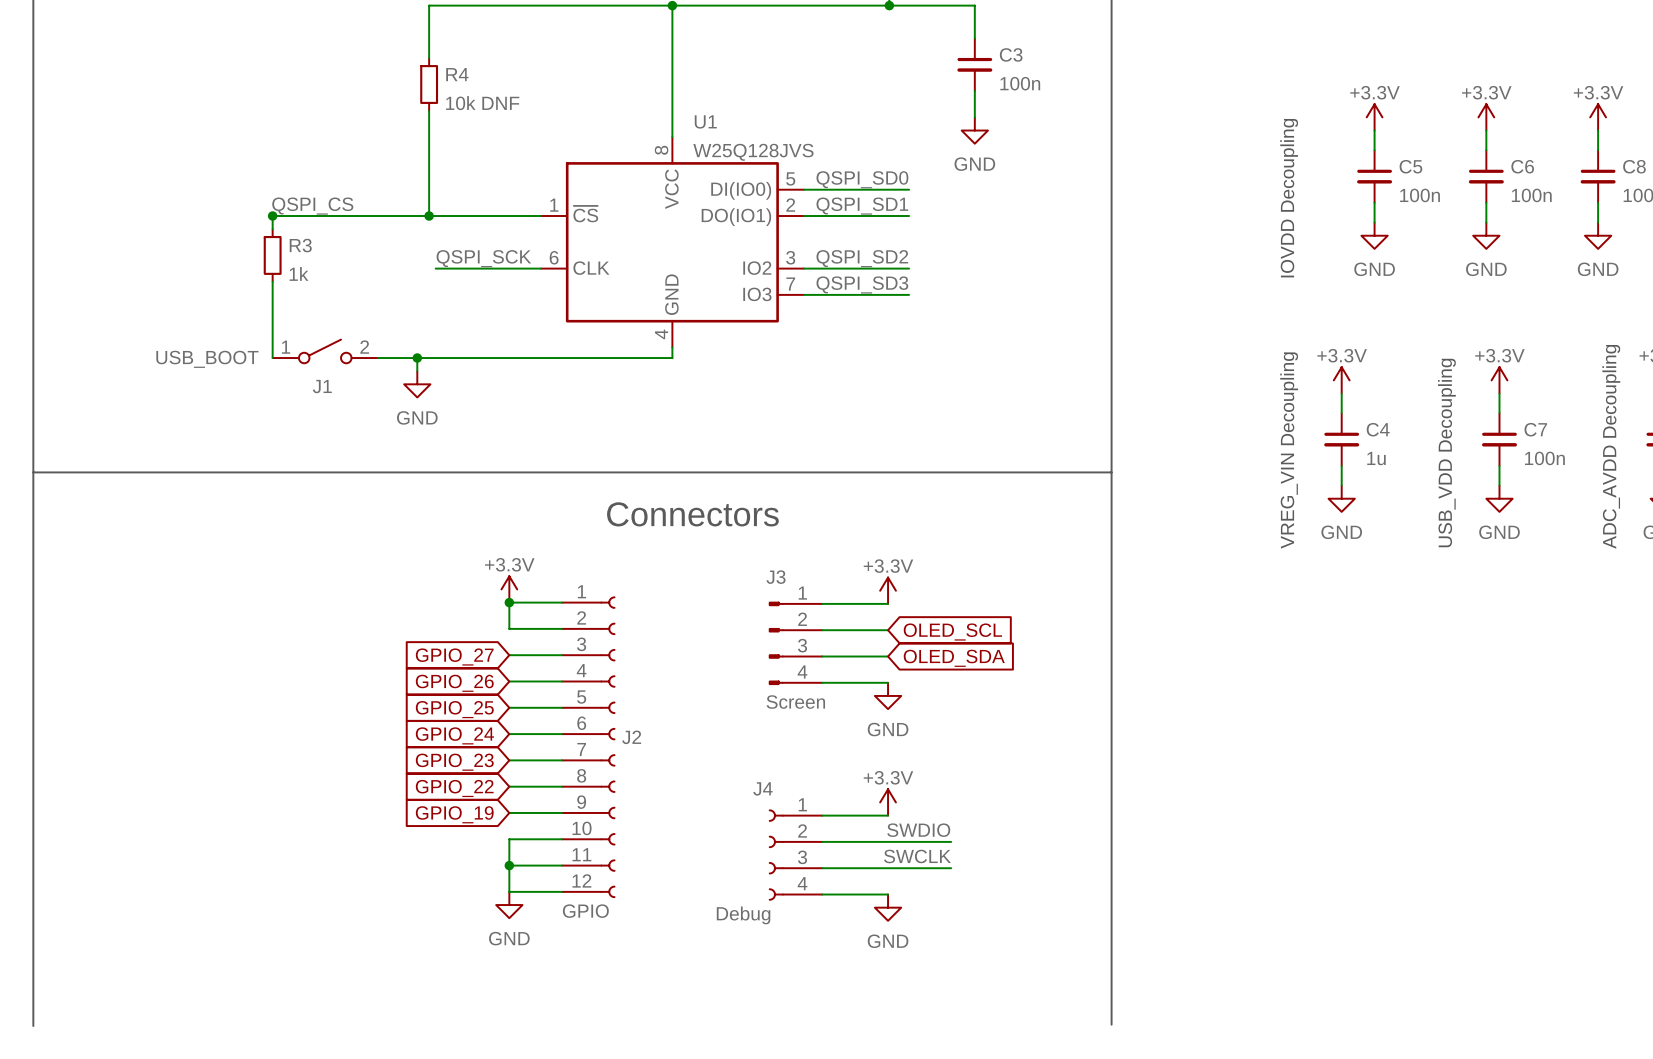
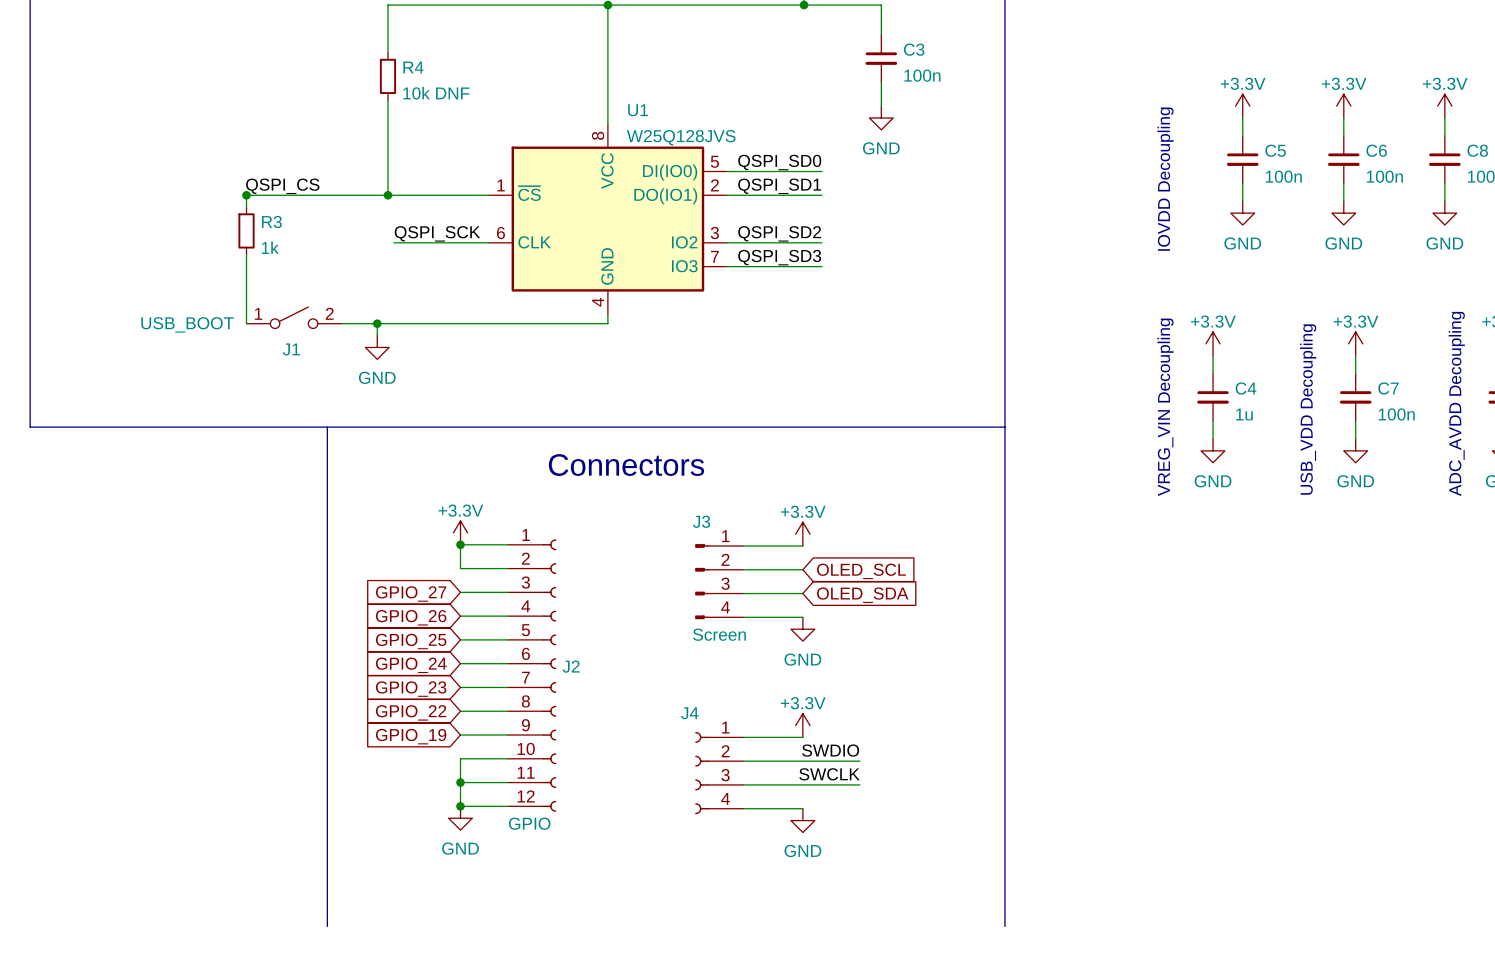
line: none -> (327, 427) (327, 926)
line: (33, 473) (33, 1026) -> none
junction: none -> (460, 806)
J4 value: Debug (743, 915) -> none

